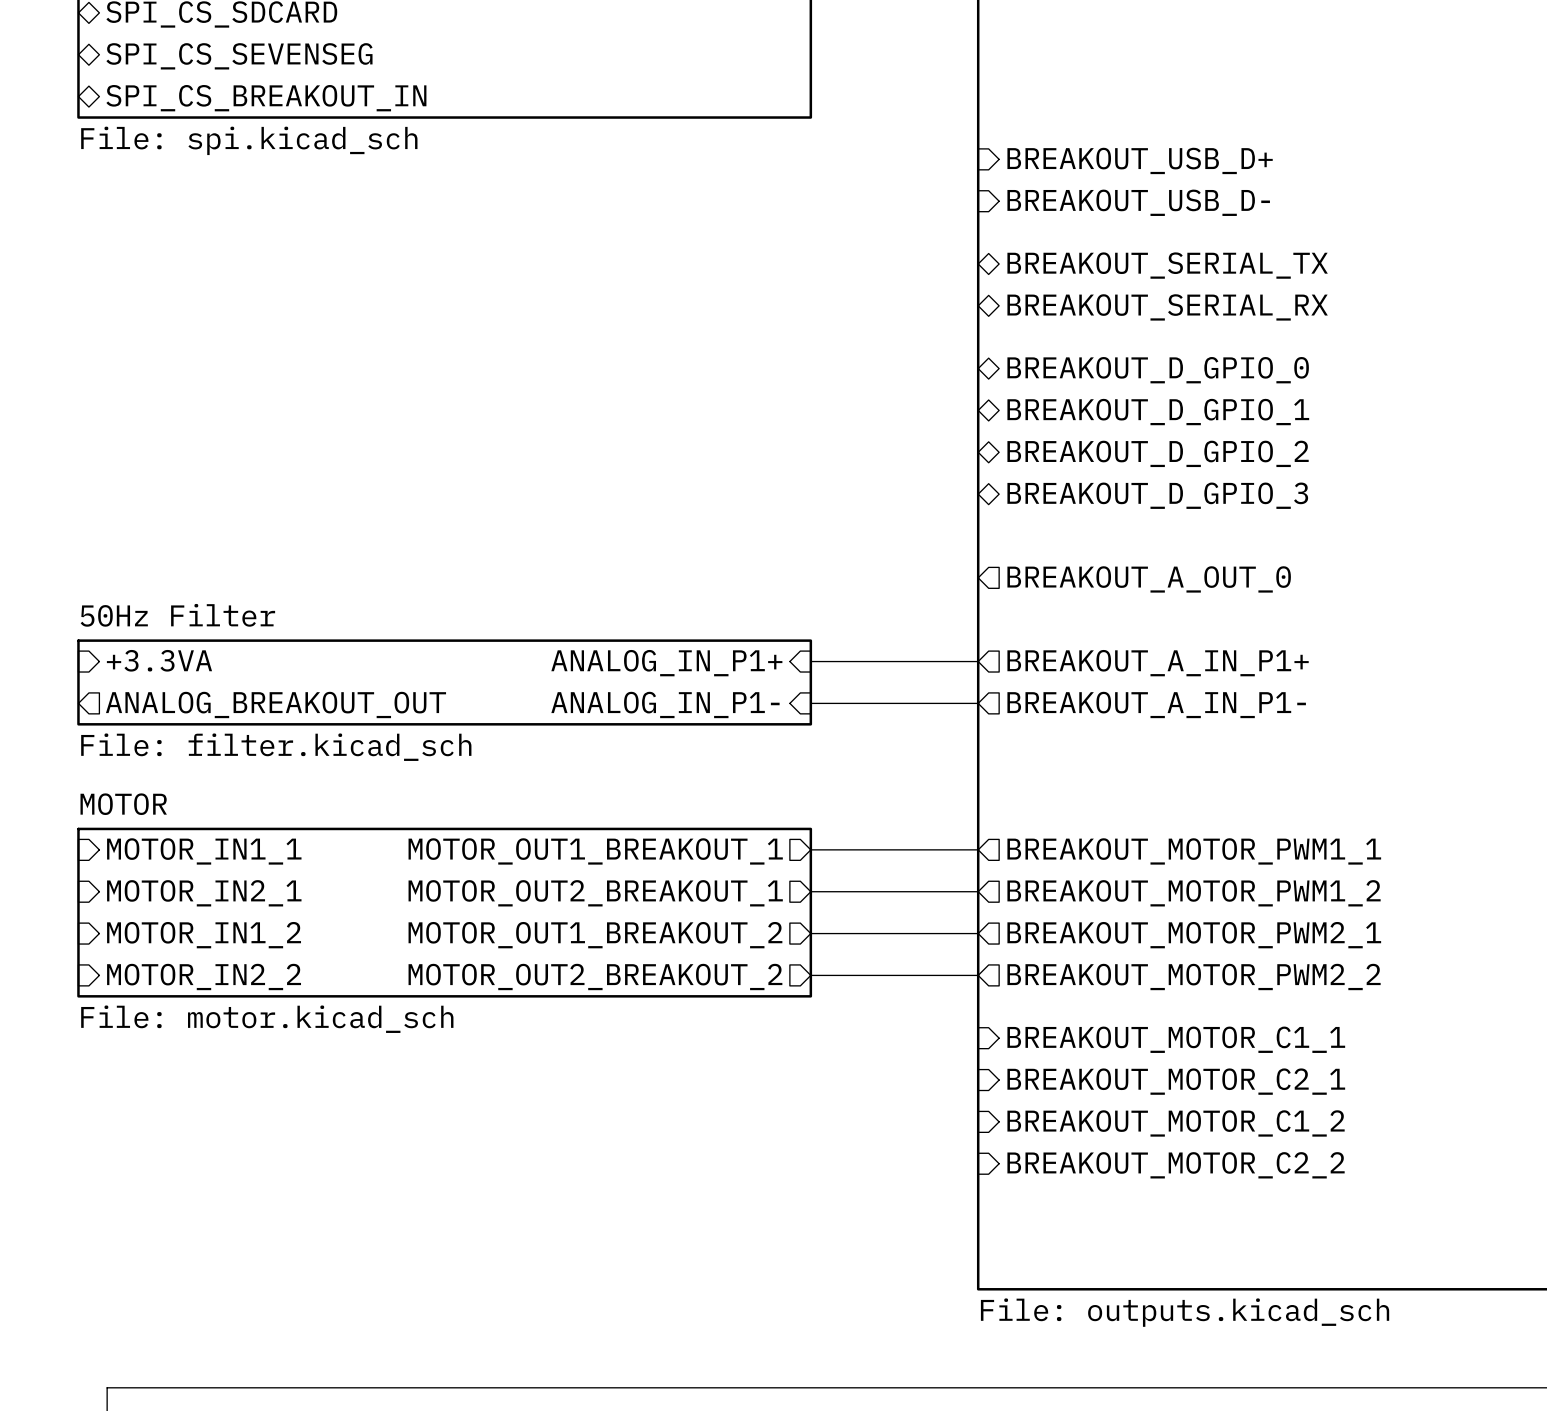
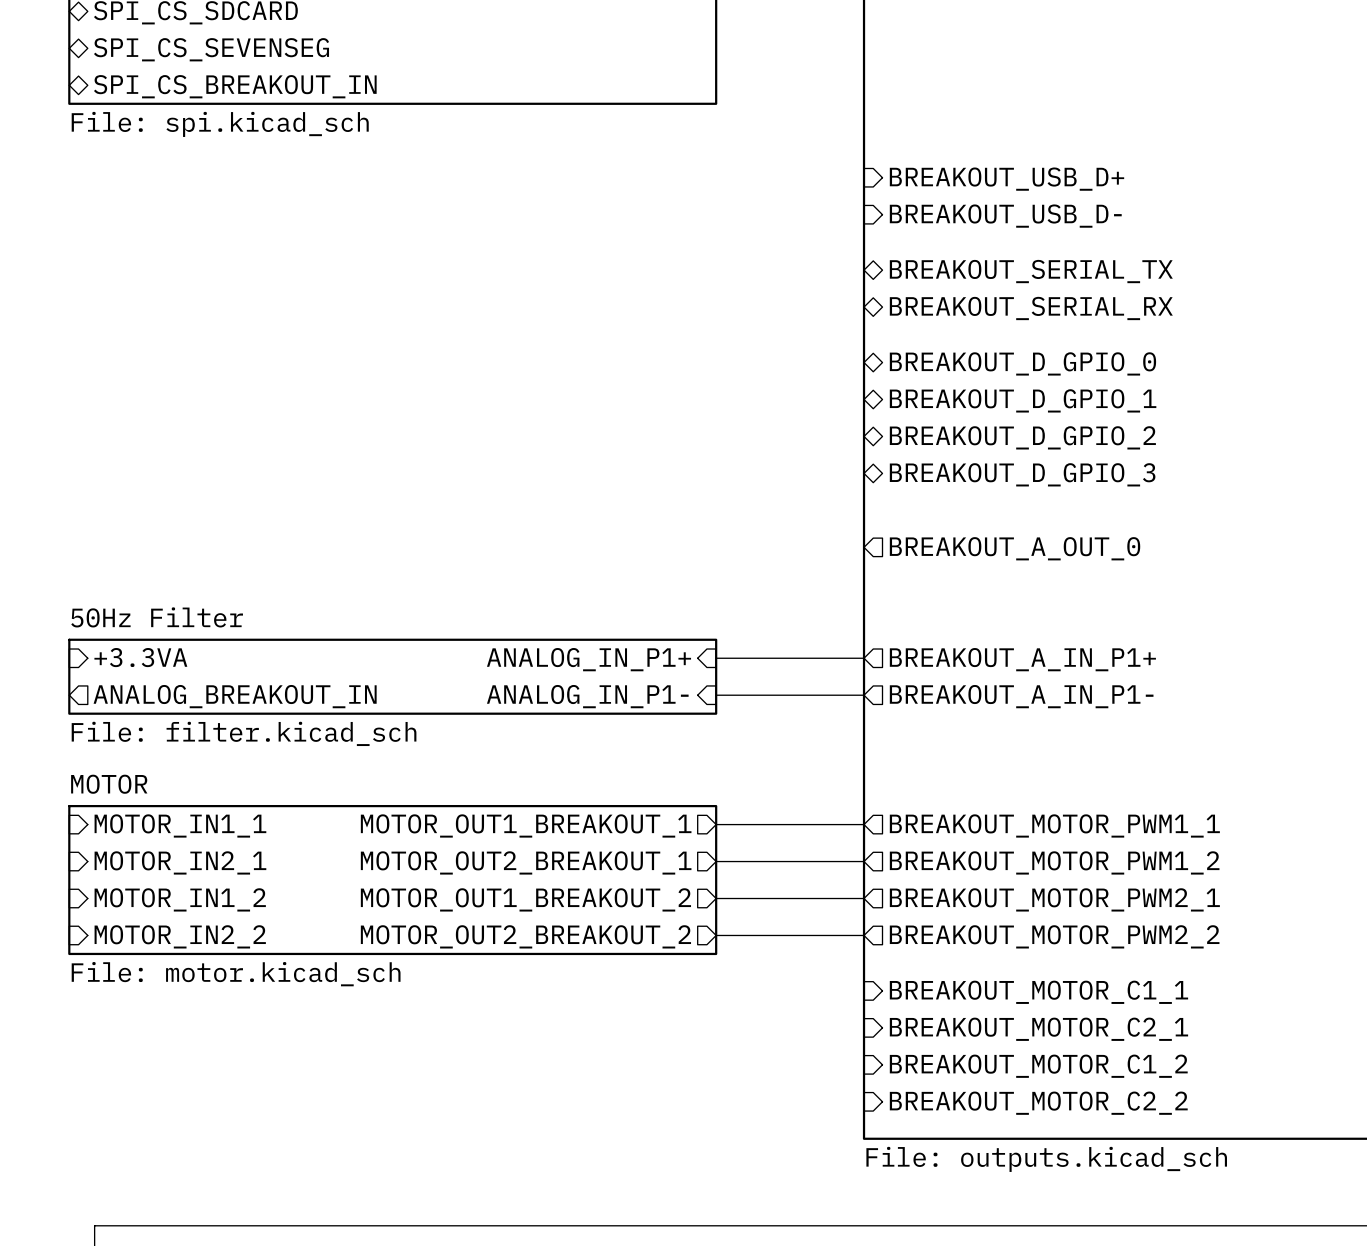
sheet pin: BREAKOUT_USB_D+ (1140, 160) -> none
sheet pin: BREAKOUT_USB_D- (1138, 202) -> BREAKOUT_USB_D+ (1006, 179)
sheet pin shape: bidirectional (1167, 265) -> input (1005, 216)
sheet pin: BREAKOUT_SERIAL_TX (1167, 265) -> BREAKOUT_USB_D- (1005, 216)
sheet pin: BREAKOUT_SERIAL_RX (1167, 307) -> BREAKOUT_SERIAL_TX (1031, 271)
sheet pin: none -> BREAKOUT_SERIAL_RX (1031, 308)
sheet pin: BREAKOUT_D_GPIO_0 (1158, 370) -> none
sheet pin: BREAKOUT_D_GPIO_1 (1158, 412) -> BREAKOUT_D_GPIO_0 (1022, 363)
sheet pin: BREAKOUT_D_GPIO_2 (1158, 453) -> BREAKOUT_D_GPIO_1 (1023, 400)
sheet pin: BREAKOUT_D_GPIO_3 (1157, 495) -> BREAKOUT_D_GPIO_2 (1022, 437)
sheet pin: none -> BREAKOUT_D_GPIO_3 (1022, 474)
sheet pin position: BREAKOUT_A_OUT_0 (1149, 579) -> BREAKOUT_A_OUT_0 (1015, 548)
sheet pin position: +3.3VA (159, 660) -> +3.3VA (140, 657)
wire: (810, 661) (978, 661) -> (716, 658) (864, 658)
sheet pin position: ANALOG_IN_P1+ (666, 663) -> ANALOG_IN_P1+ (589, 659)
sheet pin position: BREAKOUT_A_IN_P1+ (1158, 663) -> BREAKOUT_A_IN_P1+ (1022, 659)
sheet 50Hz Filter position: (444, 682) -> (392, 676)
wire: (810, 703) (978, 703) -> (716, 695) (864, 695)
sheet pin: ANALOG_BREAKOUT_OUT (276, 704) -> none
sheet pin position: ANALOG_IN_P1- (665, 704) -> ANALOG_IN_P1- (587, 696)
sheet pin position: BREAKOUT_A_IN_P1- (1156, 704) -> BREAKOUT_A_IN_P1- (1021, 696)
sheet pin: none -> ANALOG_BREAKOUT_IN (235, 696)
wire: (810, 849) (978, 849) -> (716, 935) (864, 935)
sheet pin: MOTOR_IN1_1 (204, 851) -> none
sheet pin: MOTOR_OUT1_BREAKOUT_1 (595, 851) -> none
sheet pin: BREAKOUT_MOTOR_PWM1_1 (1194, 851) -> none
wire: (810, 891) (978, 891) -> (716, 898) (864, 898)
sheet pin: MOTOR_IN2_1 (204, 893) -> none
sheet pin: MOTOR_OUT2_BREAKOUT_1 (595, 893) -> none
sheet pin: BREAKOUT_MOTOR_PWM1_2 (1194, 893) -> none
sheet MOTOR position: (444, 912) -> (392, 880)
sheet pin: MOTOR_IN1_2 (204, 935) -> MOTOR_IN1_1 (180, 825)
sheet pin: MOTOR_OUT1_BREAKOUT_2 (595, 935) -> MOTOR_OUT1_BREAKOUT_1 (526, 825)
sheet pin: BREAKOUT_MOTOR_PWM2_1 (1194, 935) -> BREAKOUT_MOTOR_PWM1_1 (1054, 825)
sheet pin: MOTOR_IN2_2 (204, 976) -> MOTOR_IN2_1 (180, 862)
sheet pin: MOTOR_OUT2_BREAKOUT_2 (595, 976) -> MOTOR_OUT2_BREAKOUT_1 (526, 862)
sheet pin: BREAKOUT_MOTOR_PWM2_2 (1194, 976) -> BREAKOUT_MOTOR_PWM1_2 (1054, 862)
sheet pin: none -> MOTOR_IN1_2 (180, 899)
sheet pin: none -> MOTOR_OUT1_BREAKOUT_2 (525, 899)
sheet pin: none -> BREAKOUT_MOTOR_PWM2_1 (1054, 899)
sheet pin: BREAKOUT_MOTOR_C1_1 (1176, 1039) -> none
sheet pin: none -> MOTOR_IN2_2 (180, 936)
sheet pin: none -> MOTOR_OUT2_BREAKOUT_2 (525, 936)
sheet pin: none -> BREAKOUT_MOTOR_PWM2_2 (1054, 936)
sheet pin: BREAKOUT_MOTOR_C2_1 (1176, 1081) -> none
sheet pin: BREAKOUT_MOTOR_C1_2 (1176, 1123) -> BREAKOUT_MOTOR_C1_1 (1038, 992)
sheet pin: BREAKOUT_MOTOR_C2_2 (1176, 1165) -> BREAKOUT_MOTOR_C2_1 (1038, 1029)
sheet pin: none -> BREAKOUT_MOTOR_C1_2 (1038, 1066)
sheet pin: none -> BREAKOUT_MOTOR_C2_2 (1038, 1103)

